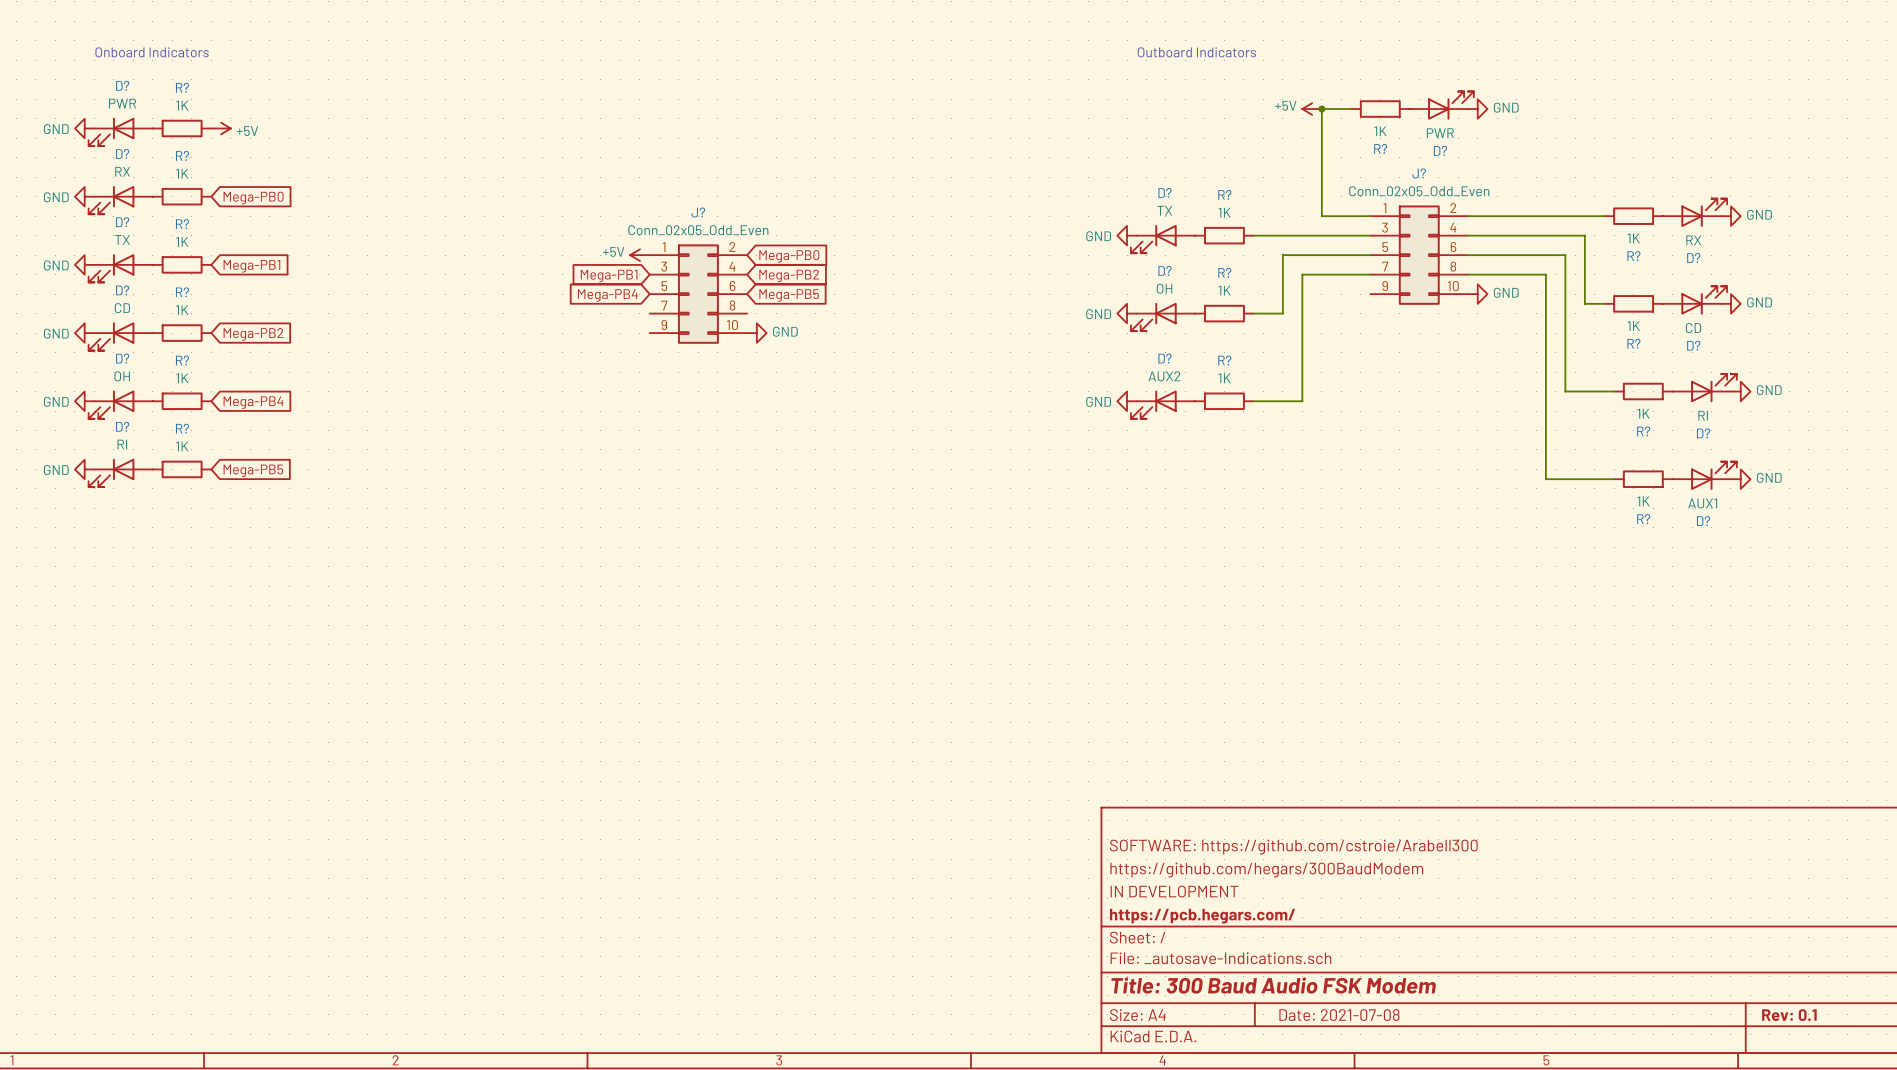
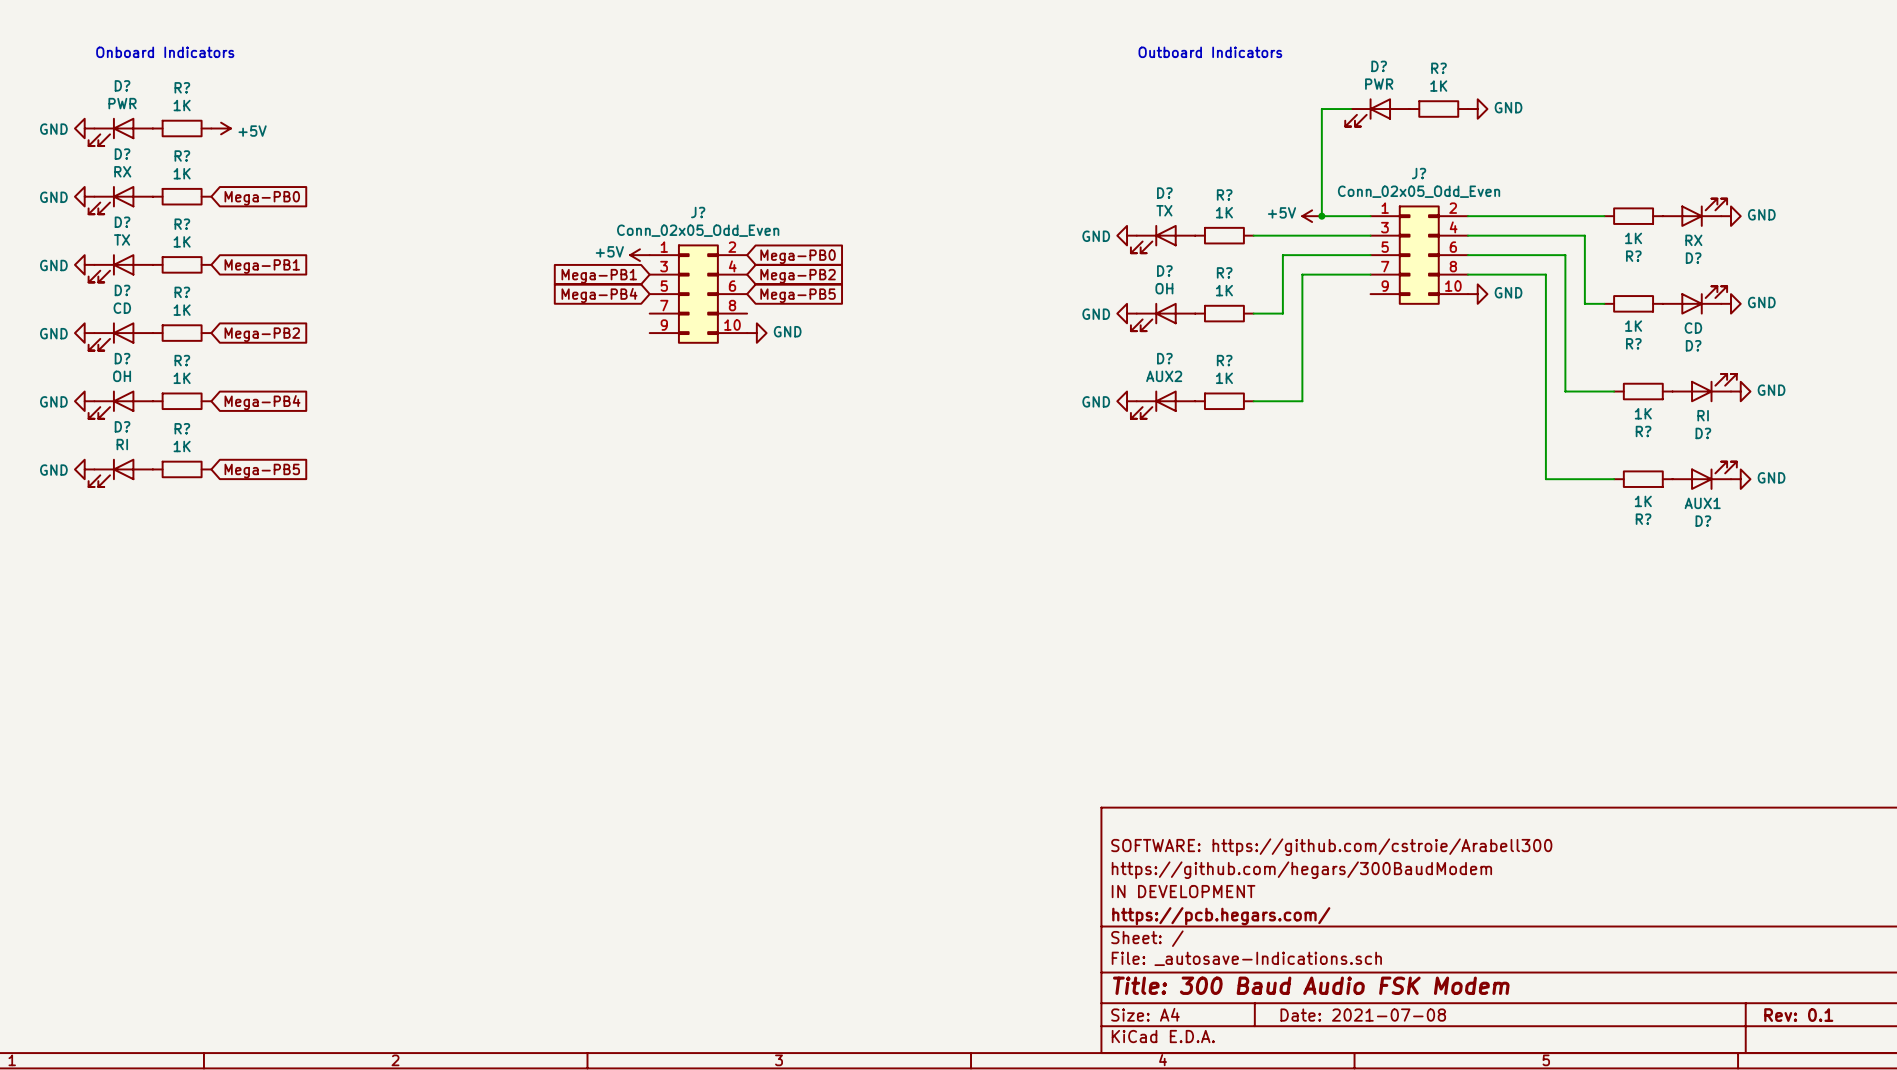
D? position: (1441, 105) -> (1377, 112)
D? rotation: 0° (1450, 105) -> 180° (1368, 112)
power symbol position: +5V (1312, 109) -> +5V (1312, 216)
junction: (1321, 109) -> none
R? position: (1380, 109) -> (1438, 109)
R? value position: 1K (1380, 131) -> 1K (1438, 86)
R? name position: R? (1380, 148) -> R? (1438, 68)
junction: none -> (1321, 216)

